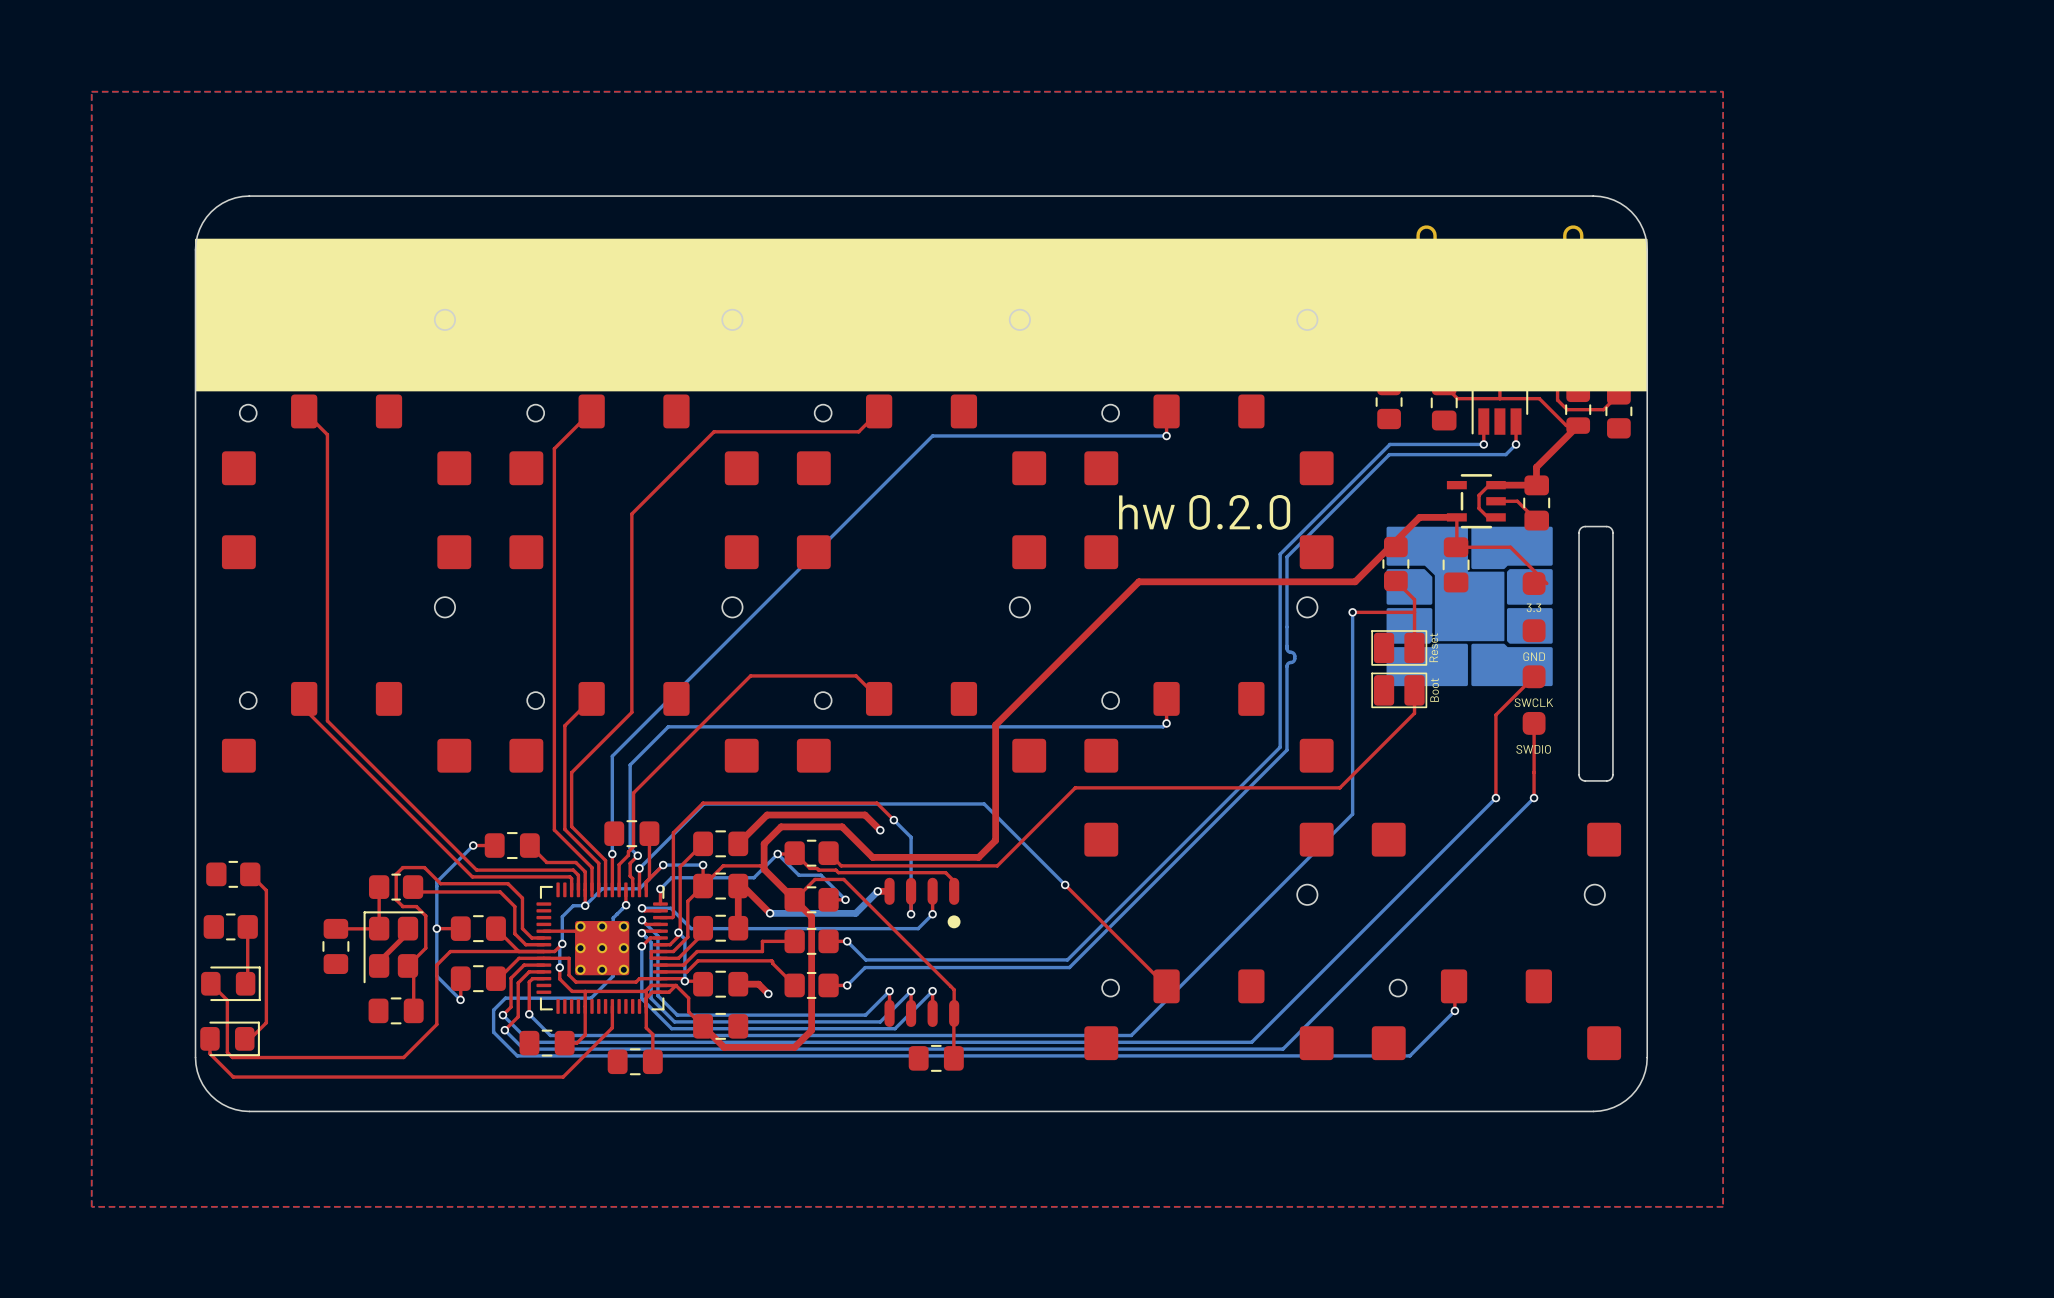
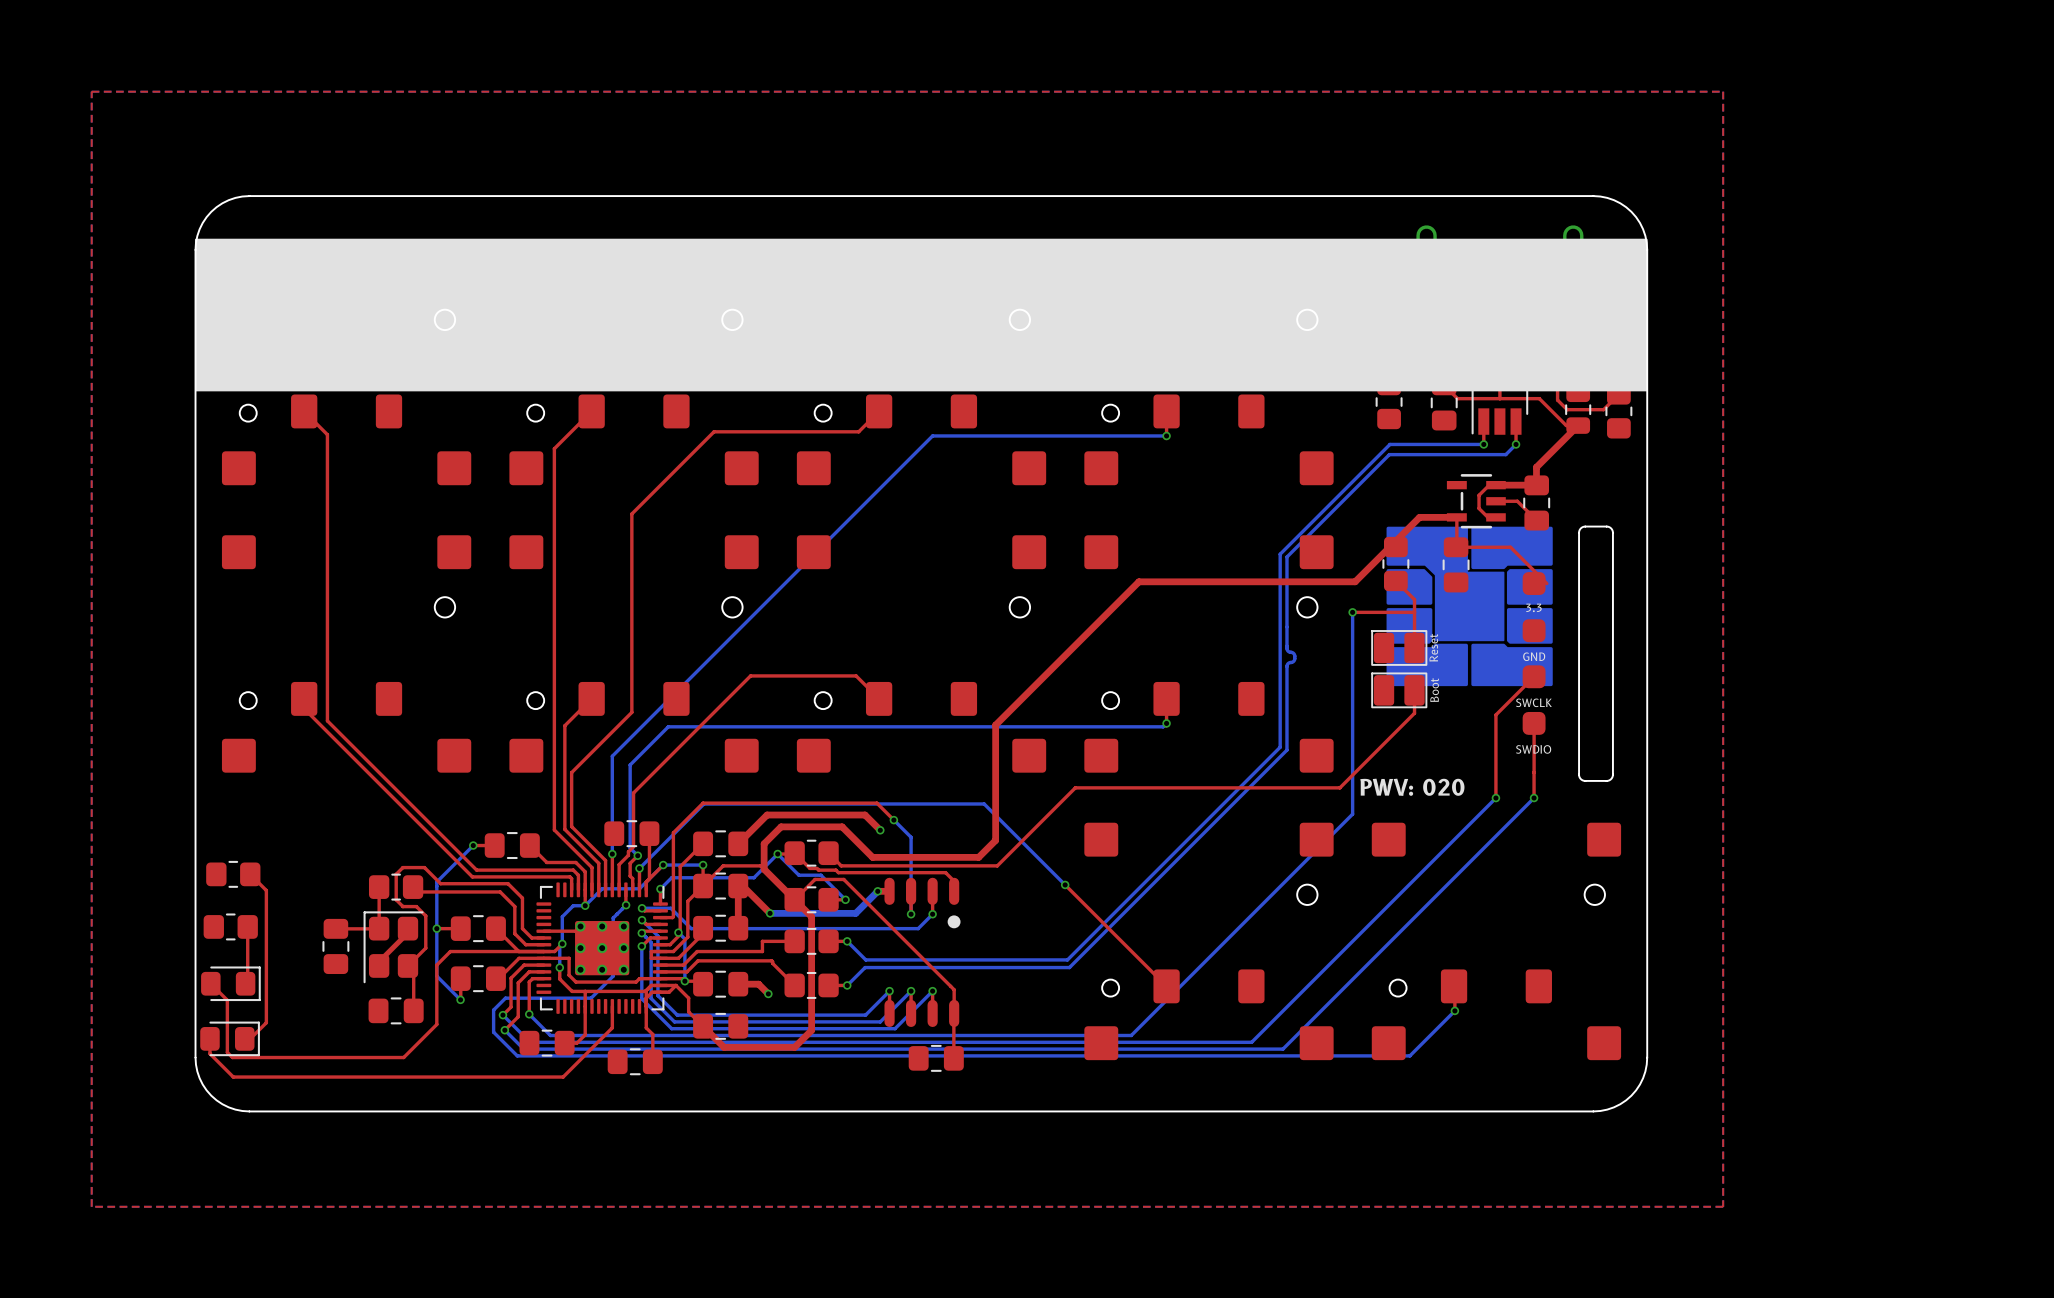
text: hw 0.2.0 (1204, 512) -> none
text: none -> PWV: 020 (1412, 787)

